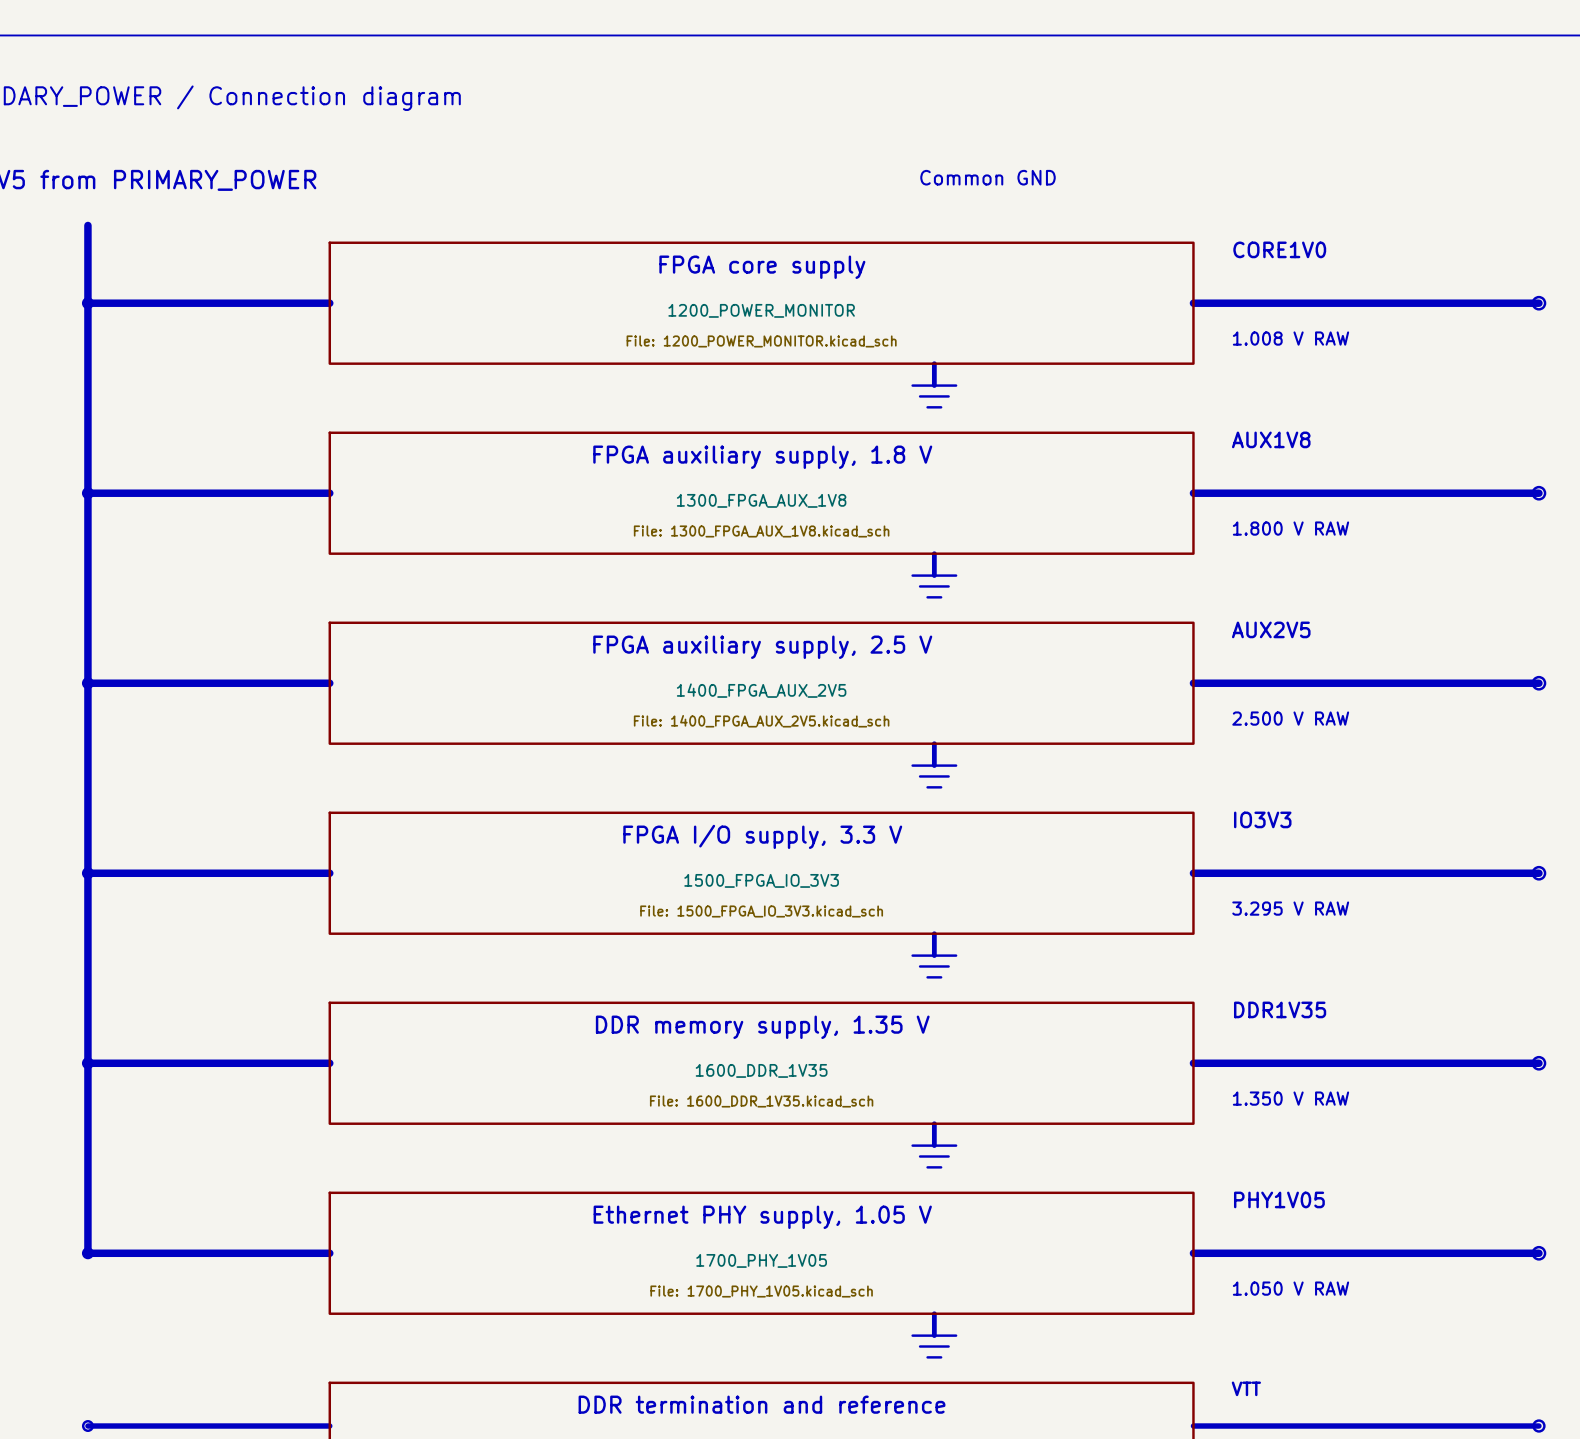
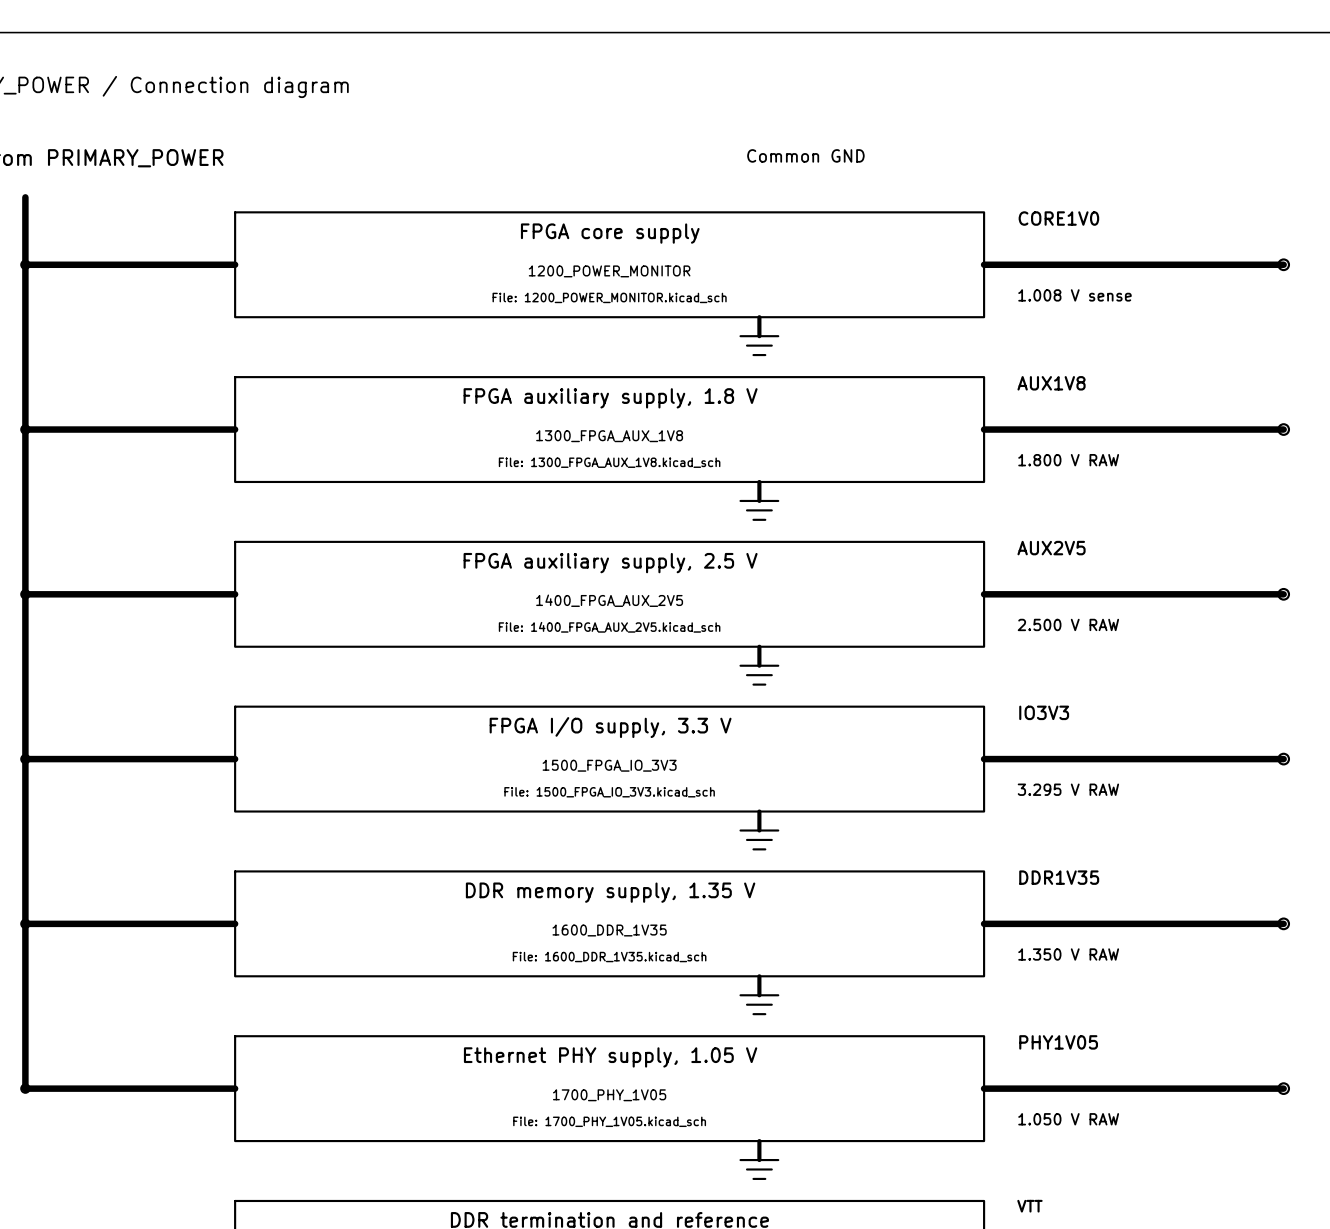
text: 1.008 V RAW (1290, 338) -> 1.008 V sense (1074, 295)

